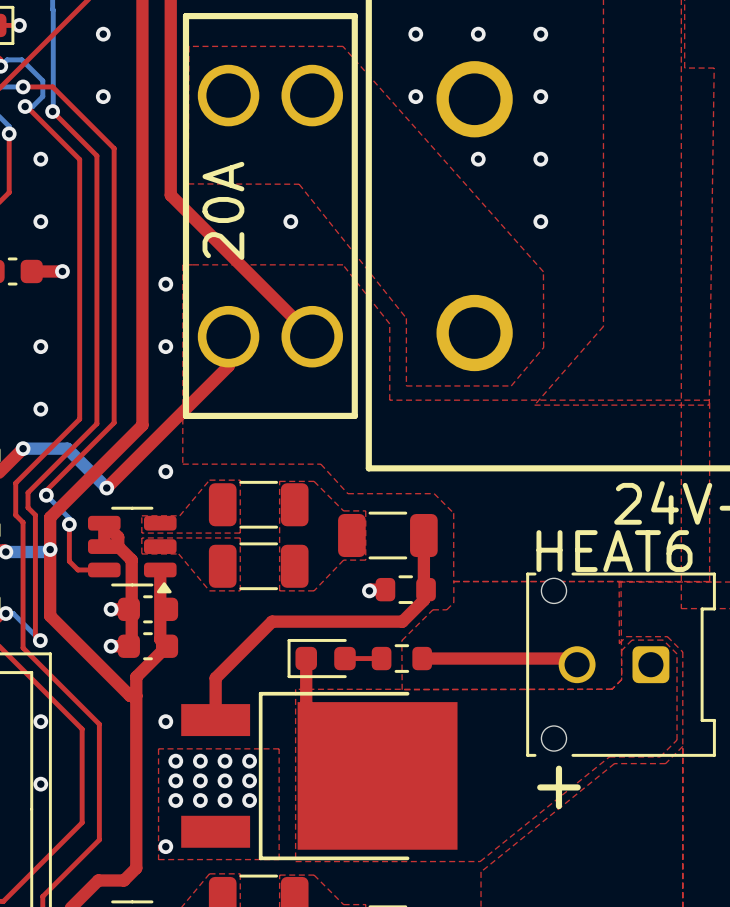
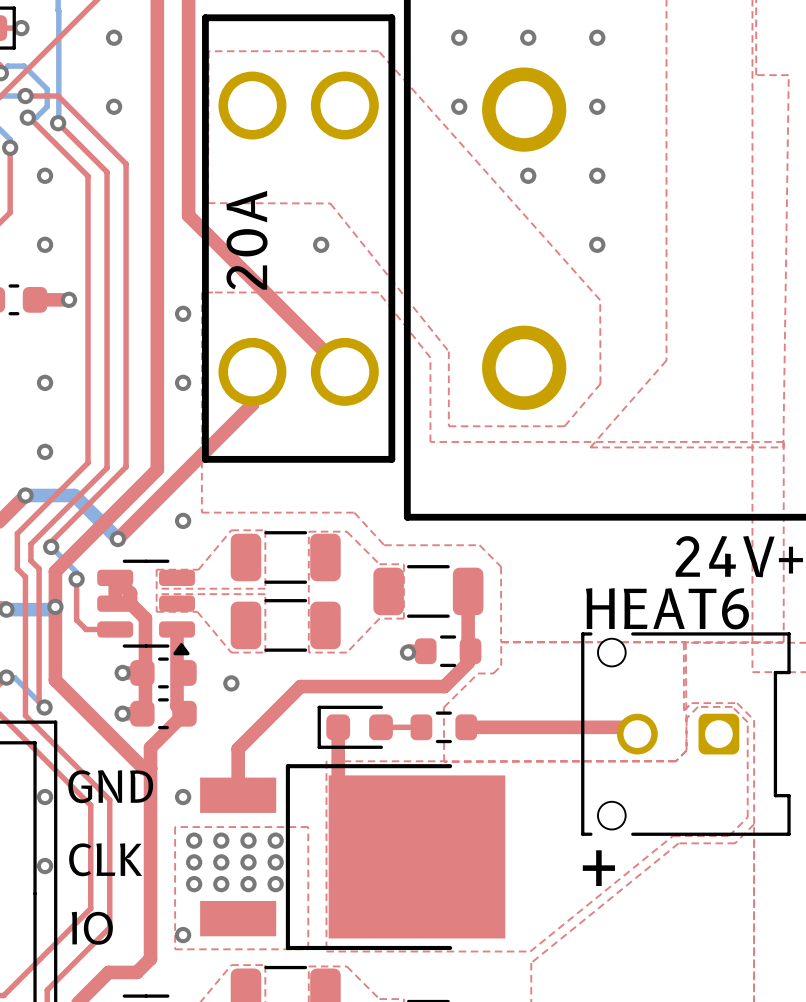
via: none -> (231, 683)
text: none -> GND (110, 786)
text: none -> CLK (105, 859)
text: none -> IO (92, 928)

